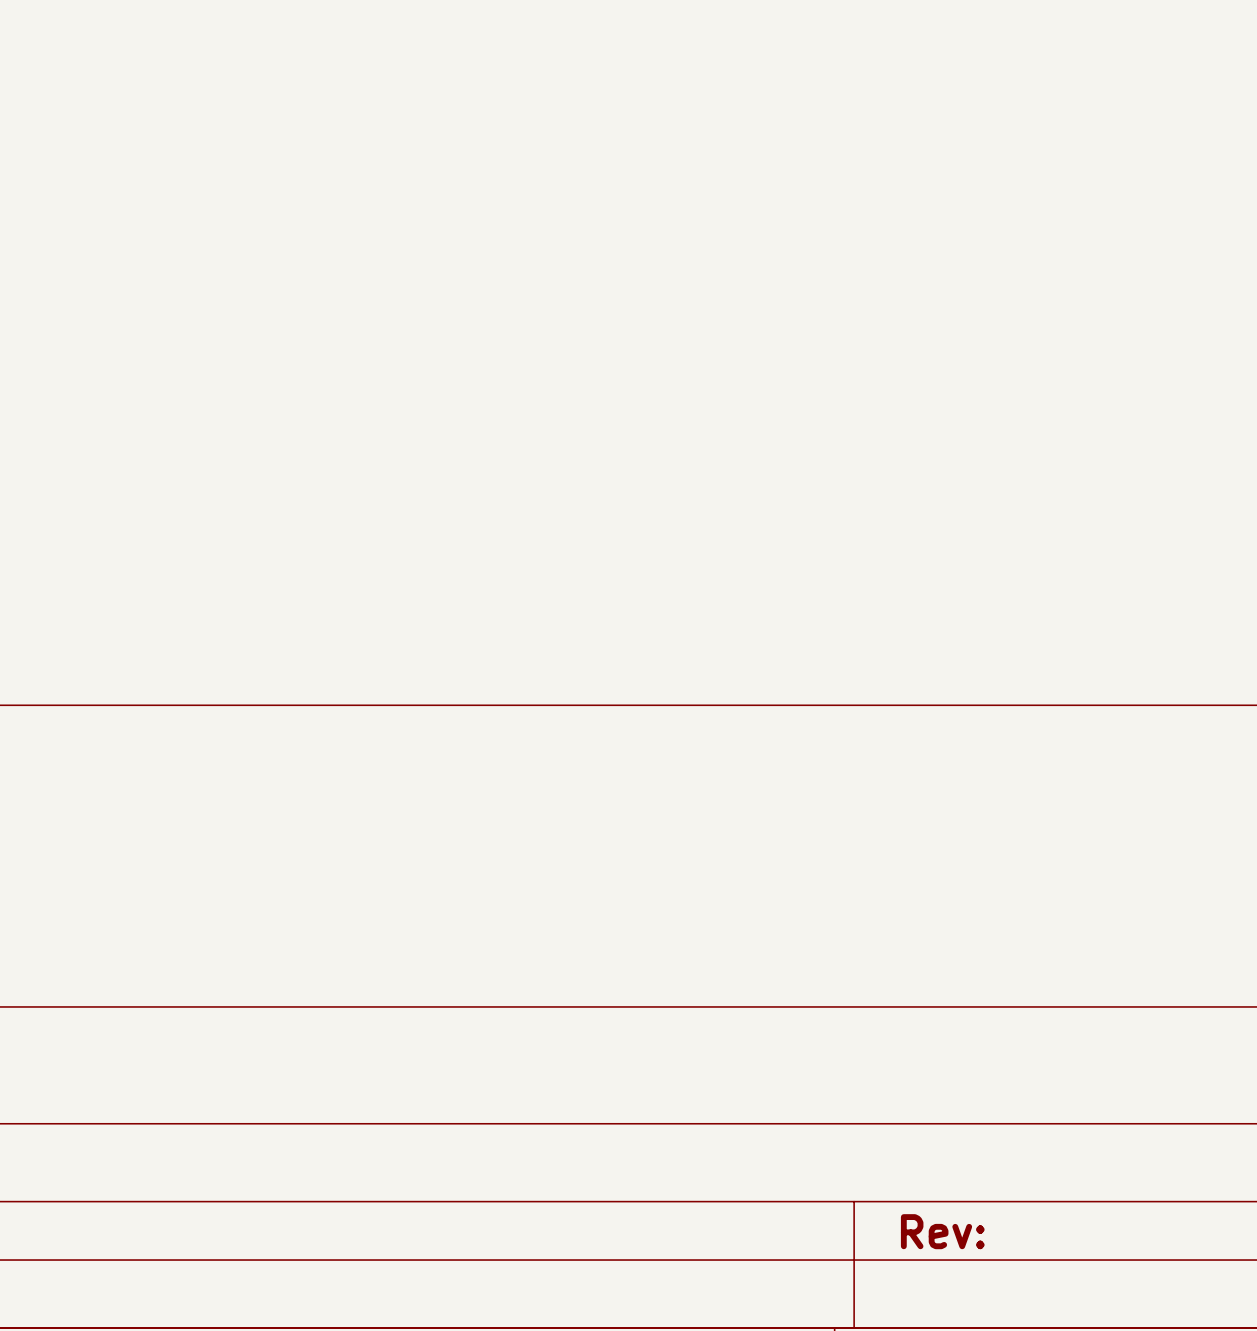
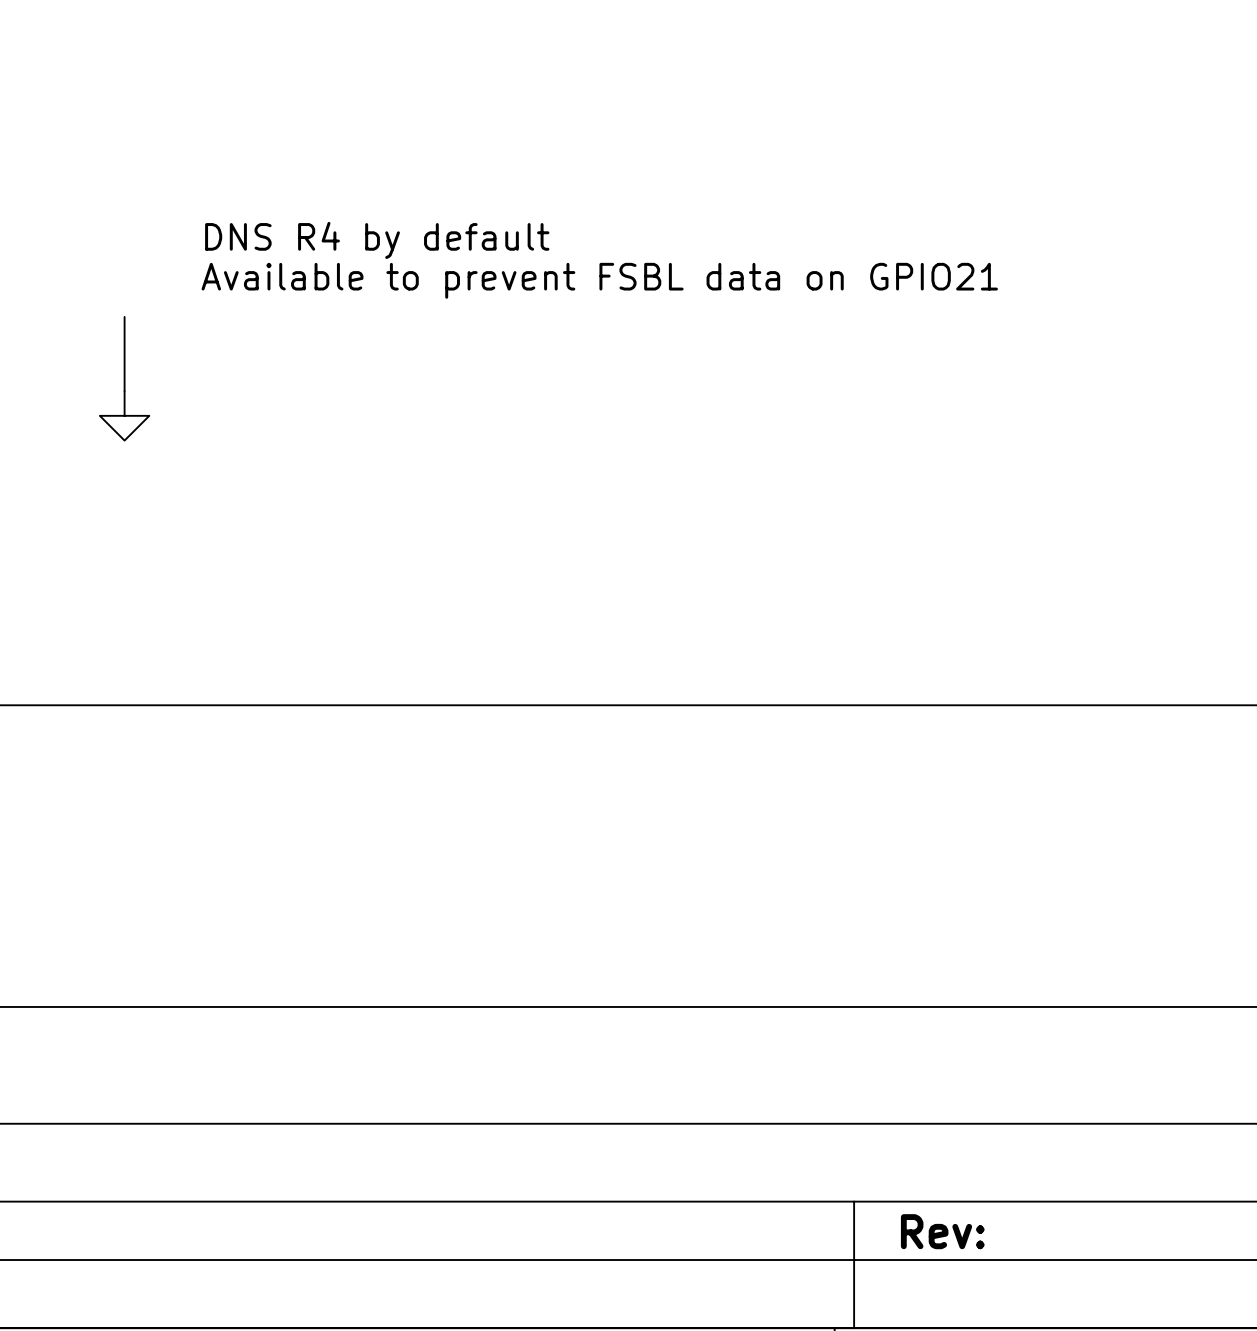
text: none -> DNS R4 by default (377, 240)
text: none -> Available to prevent FSBL data on GPIO21 (599, 280)
wire: none -> (124, 316) (124, 391)
power symbol: none -> (124, 415)

